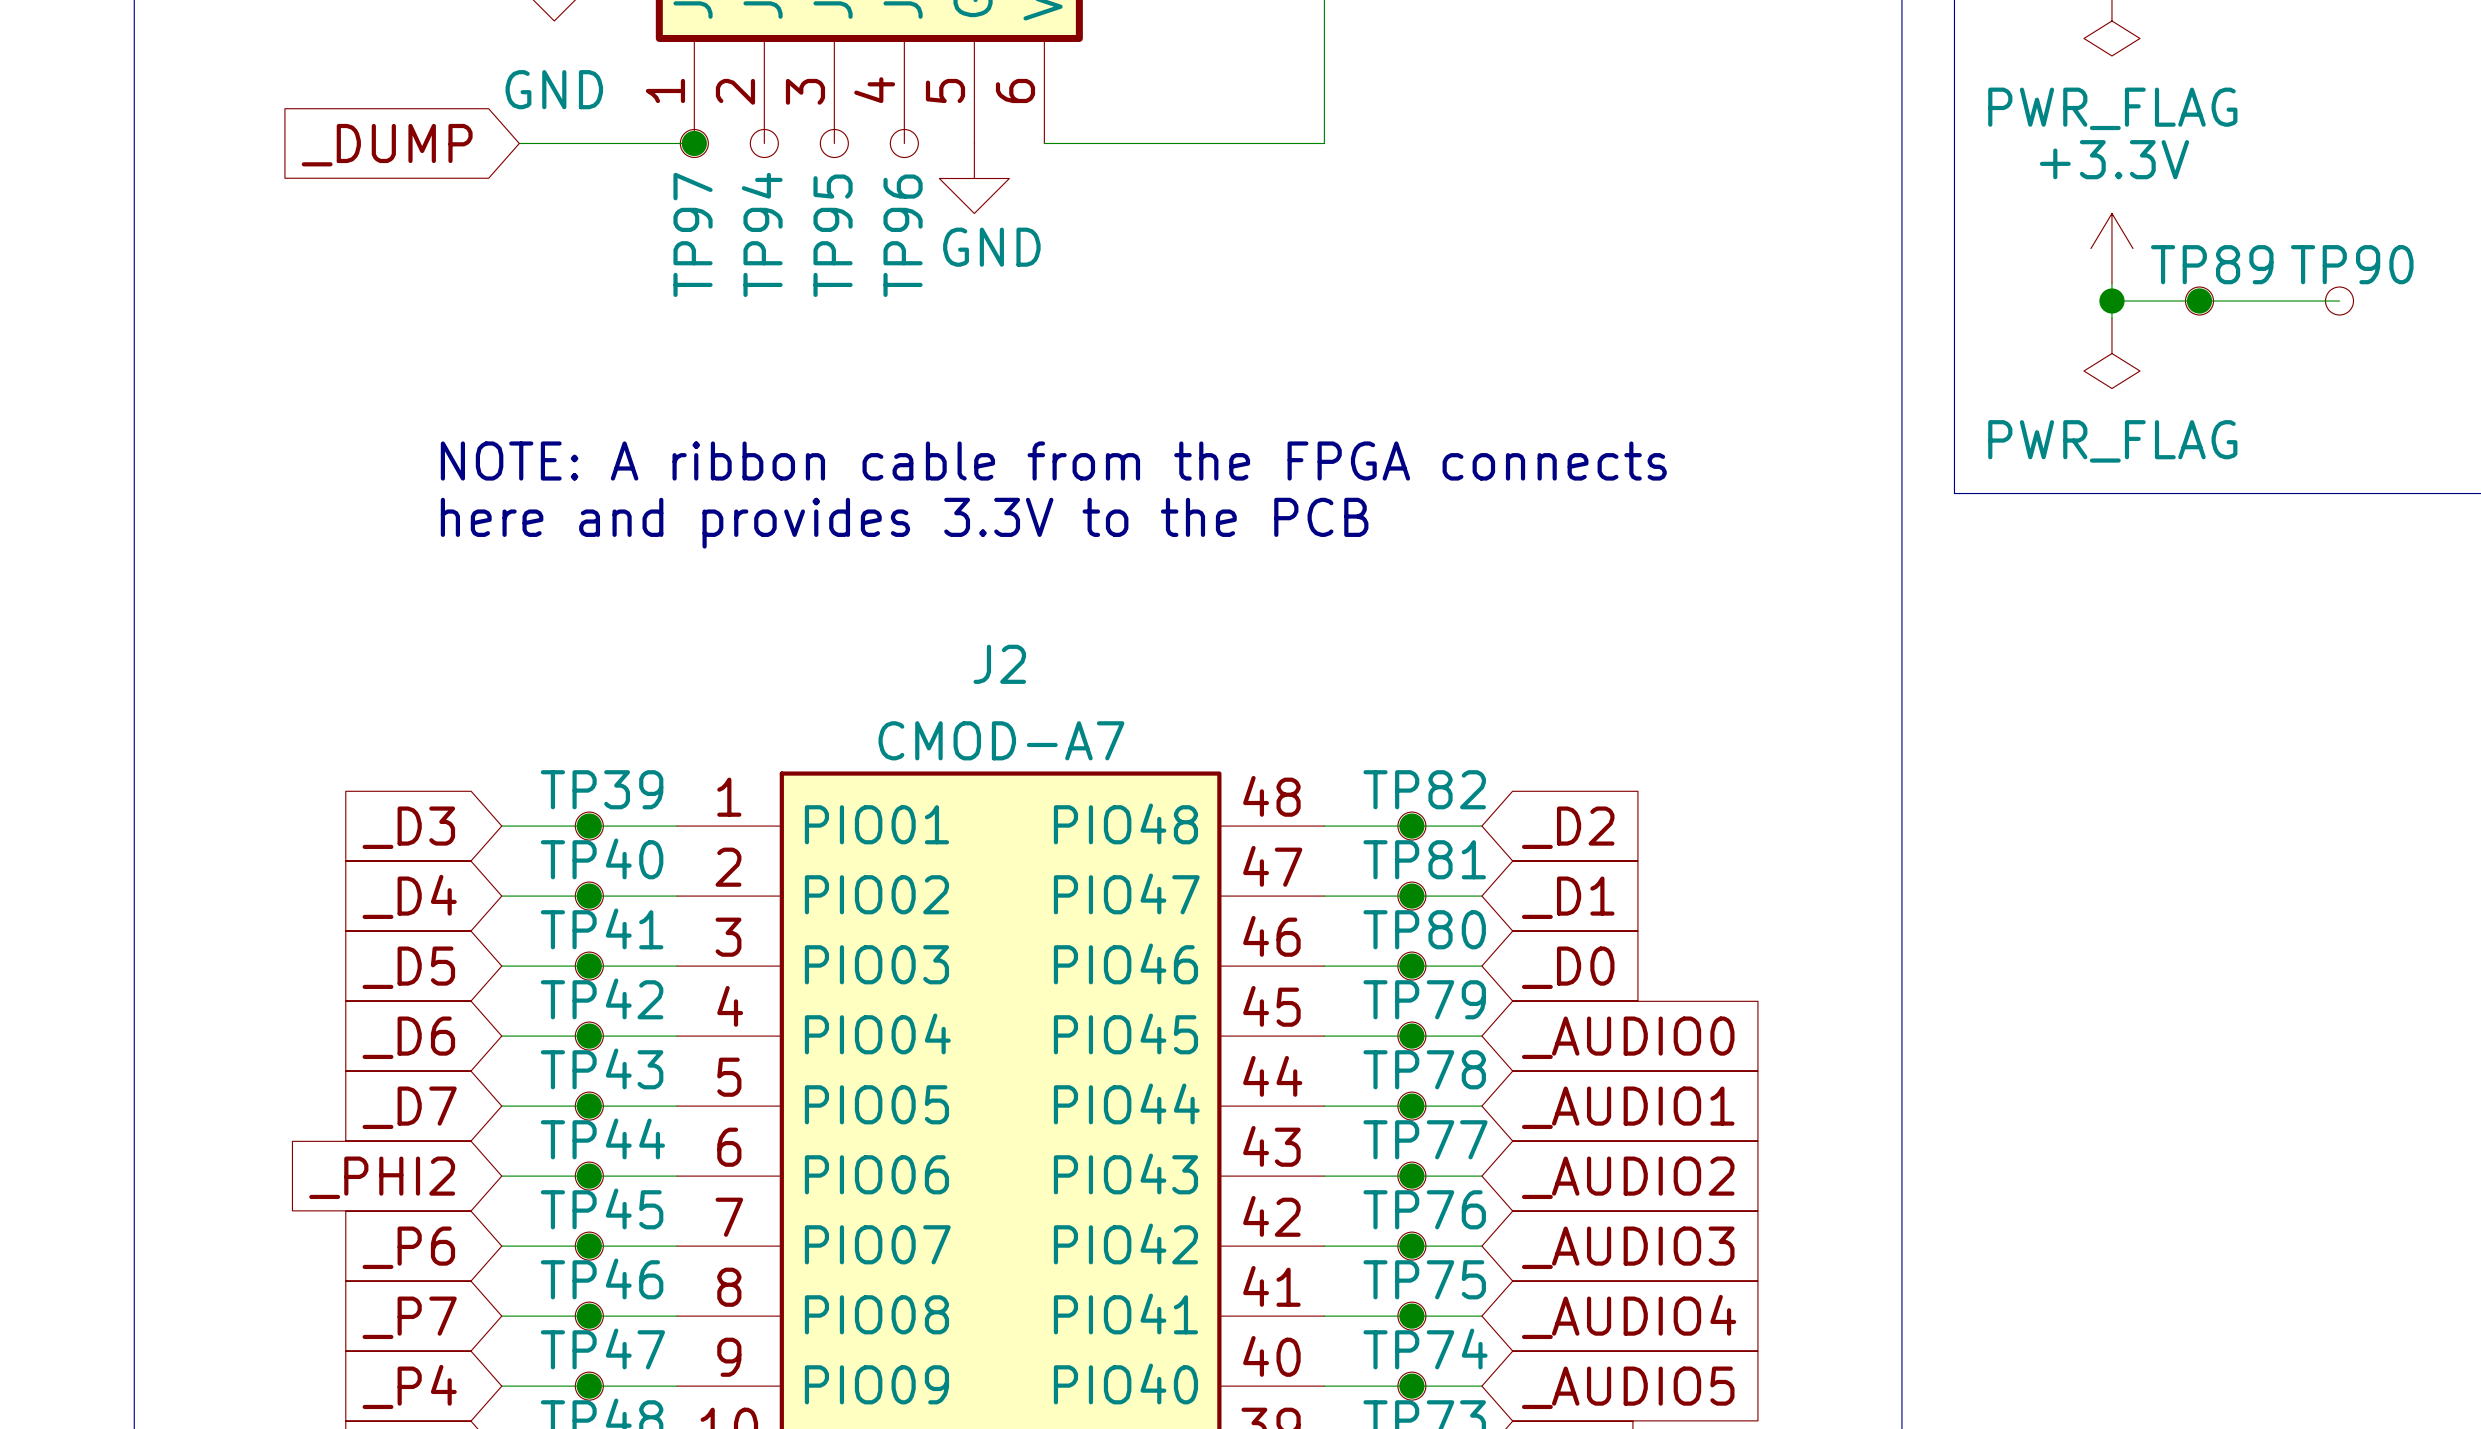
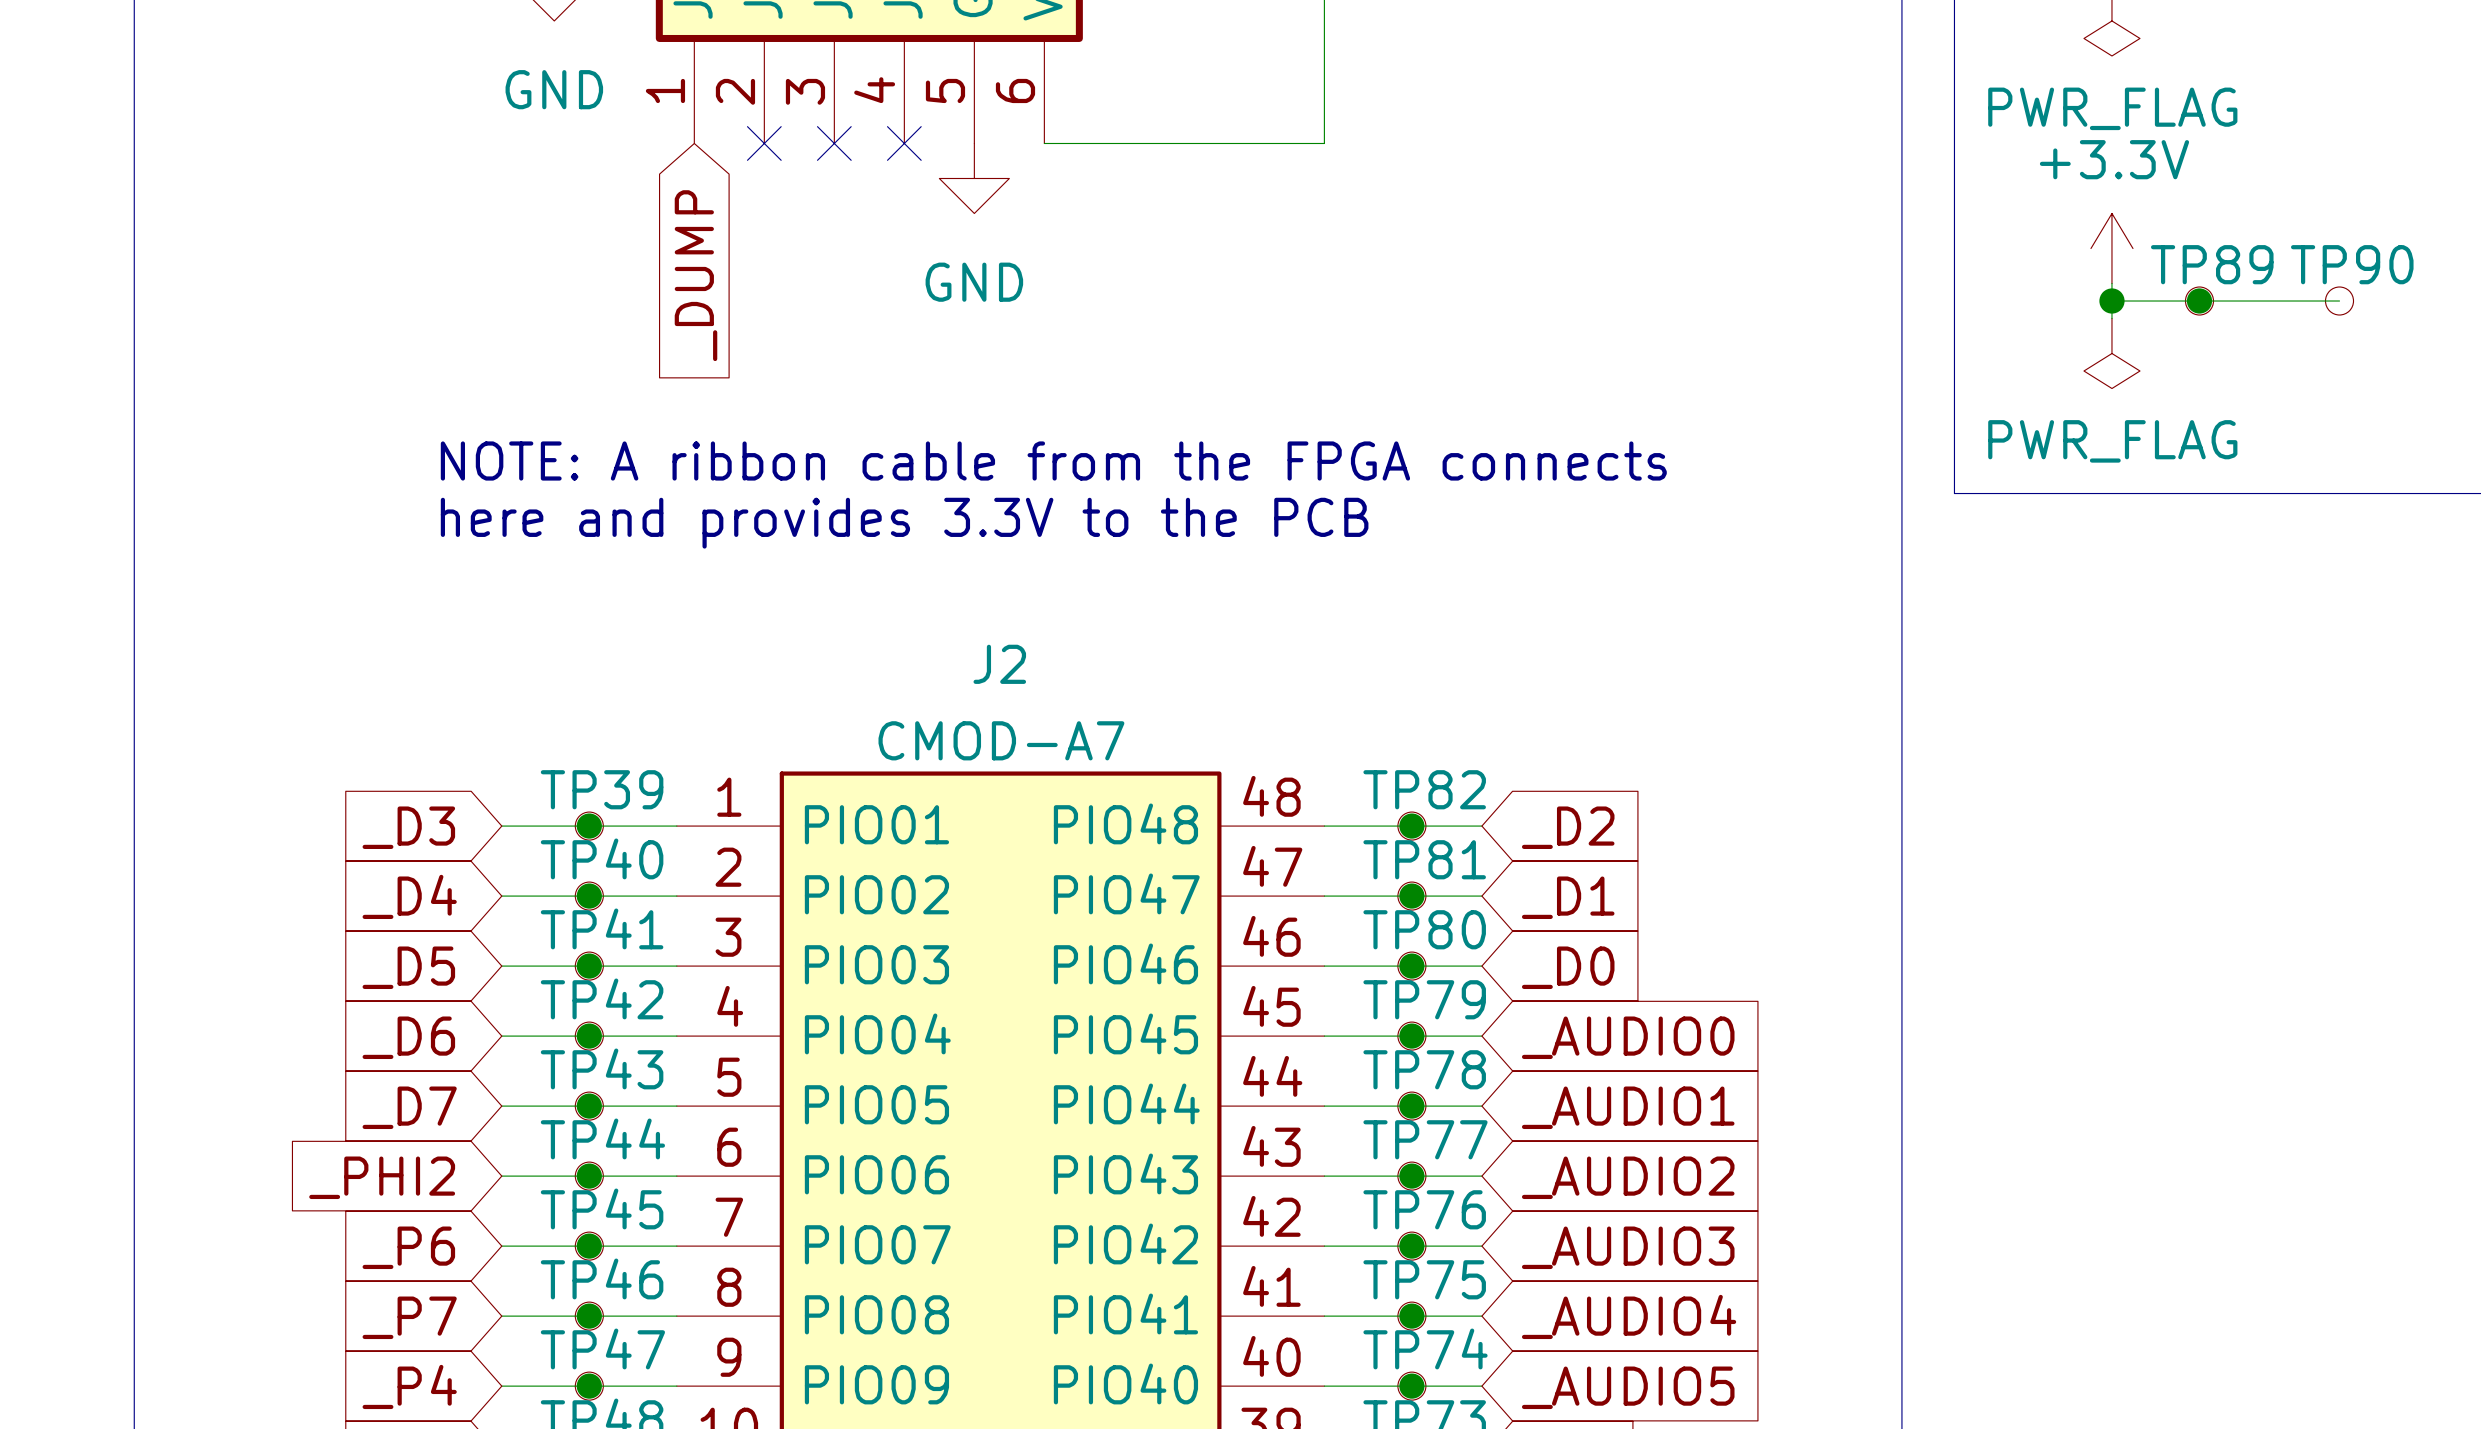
wire: (519, 143) (694, 143) -> none
junction: (694, 143) -> none
TP97: (694, 143) -> none
TP94: (764, 143) -> none
no-connect mark: none -> (764, 143)
TP95: (834, 143) -> none
no-connect mark: none -> (834, 143)
TP96: (904, 143) -> none
no-connect mark: none -> (904, 143)
global label rotation: 0° (387, 145) -> 90° counterclockwise (695, 275)
global label position: _DUMP (387, 145) -> _DUMP (695, 275)
power symbol text position: GND (991, 247) -> GND (974, 282)

